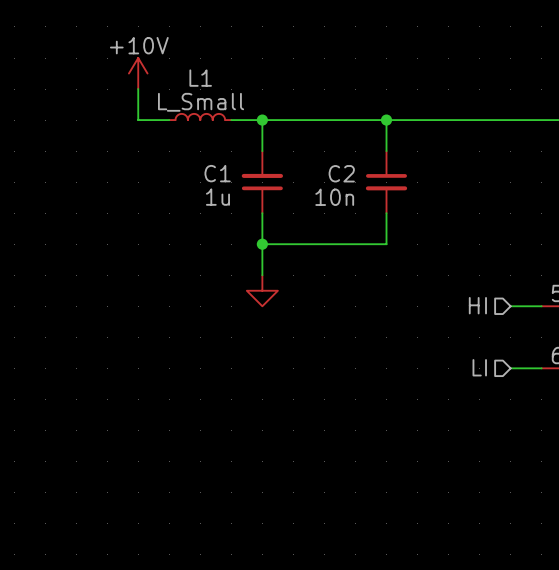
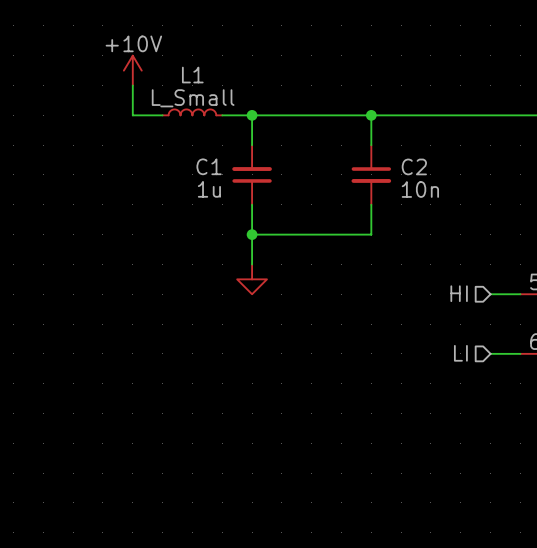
C2 name position: C2 (341, 173) -> C2 (414, 166)
C2 value position: 10n (334, 197) -> 10n (420, 189)

